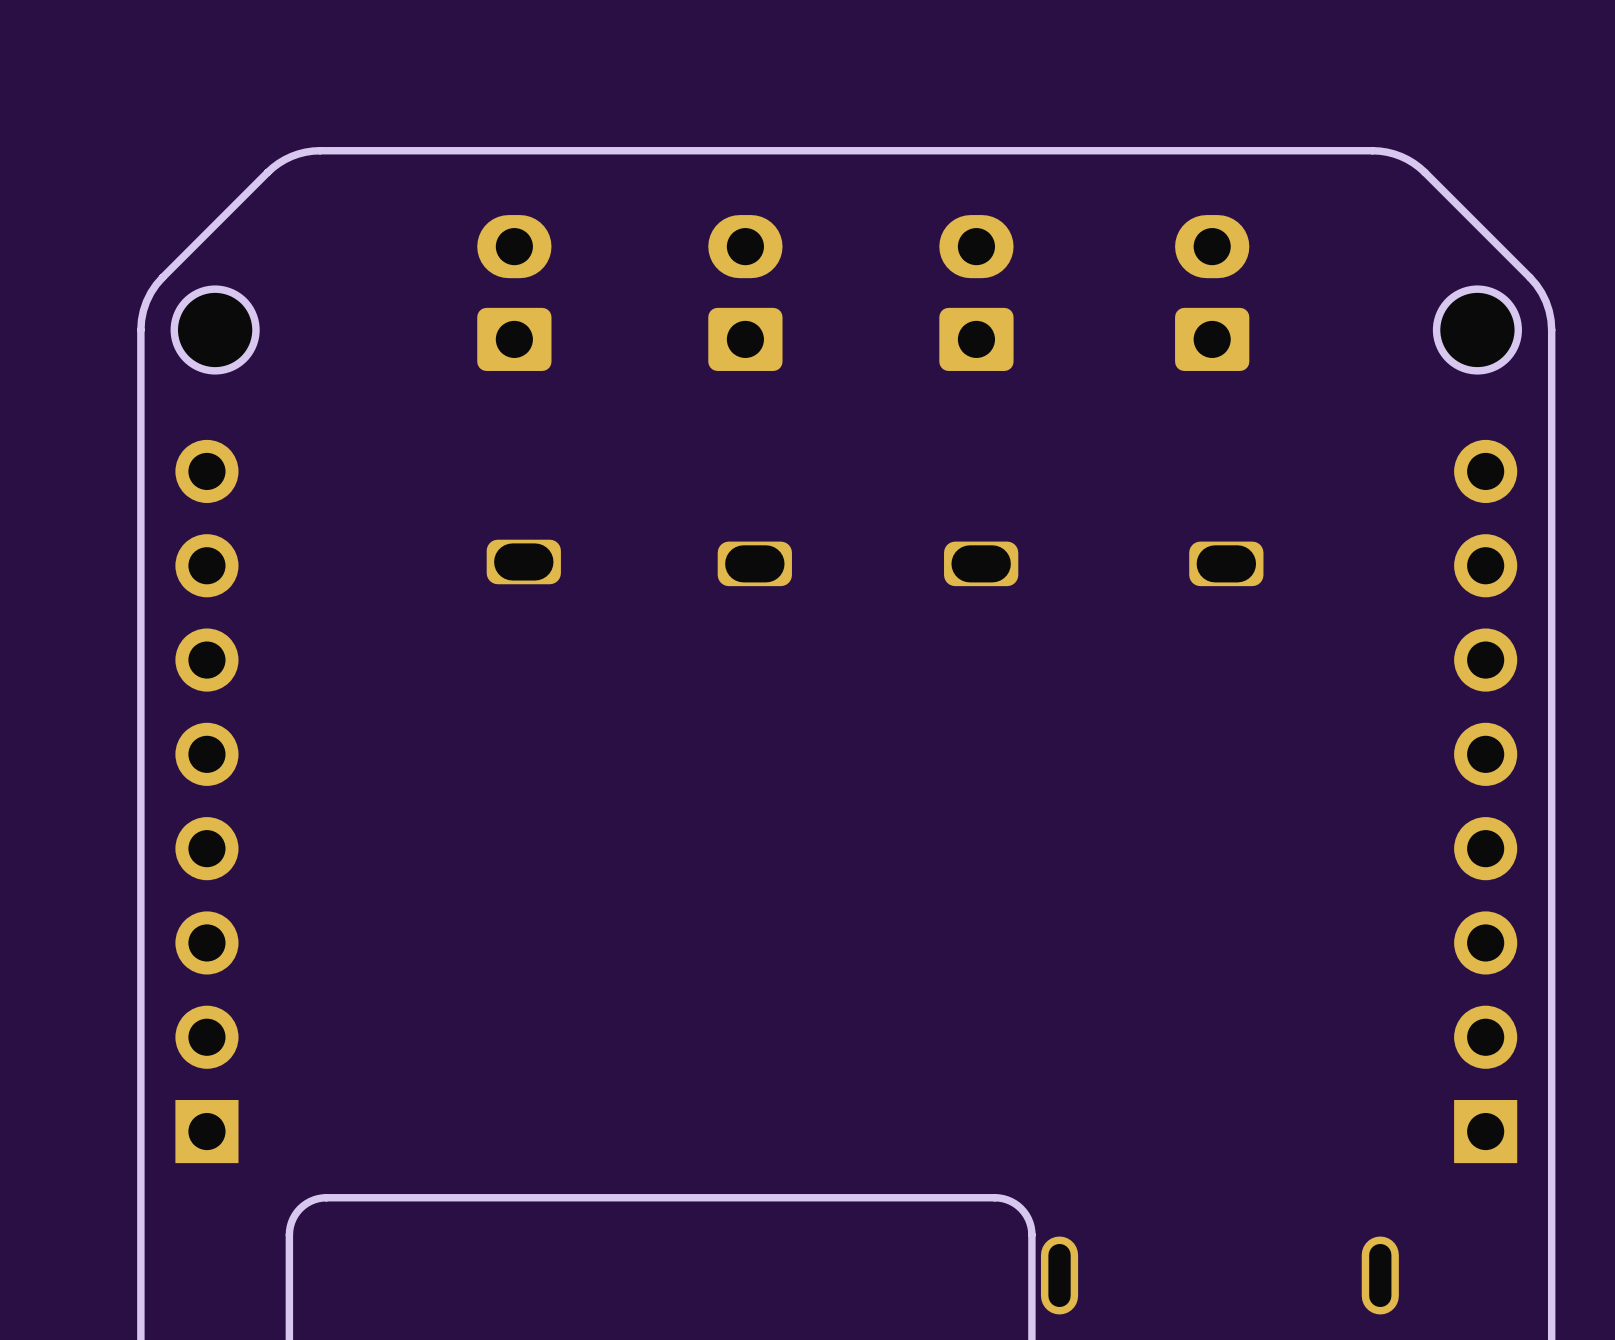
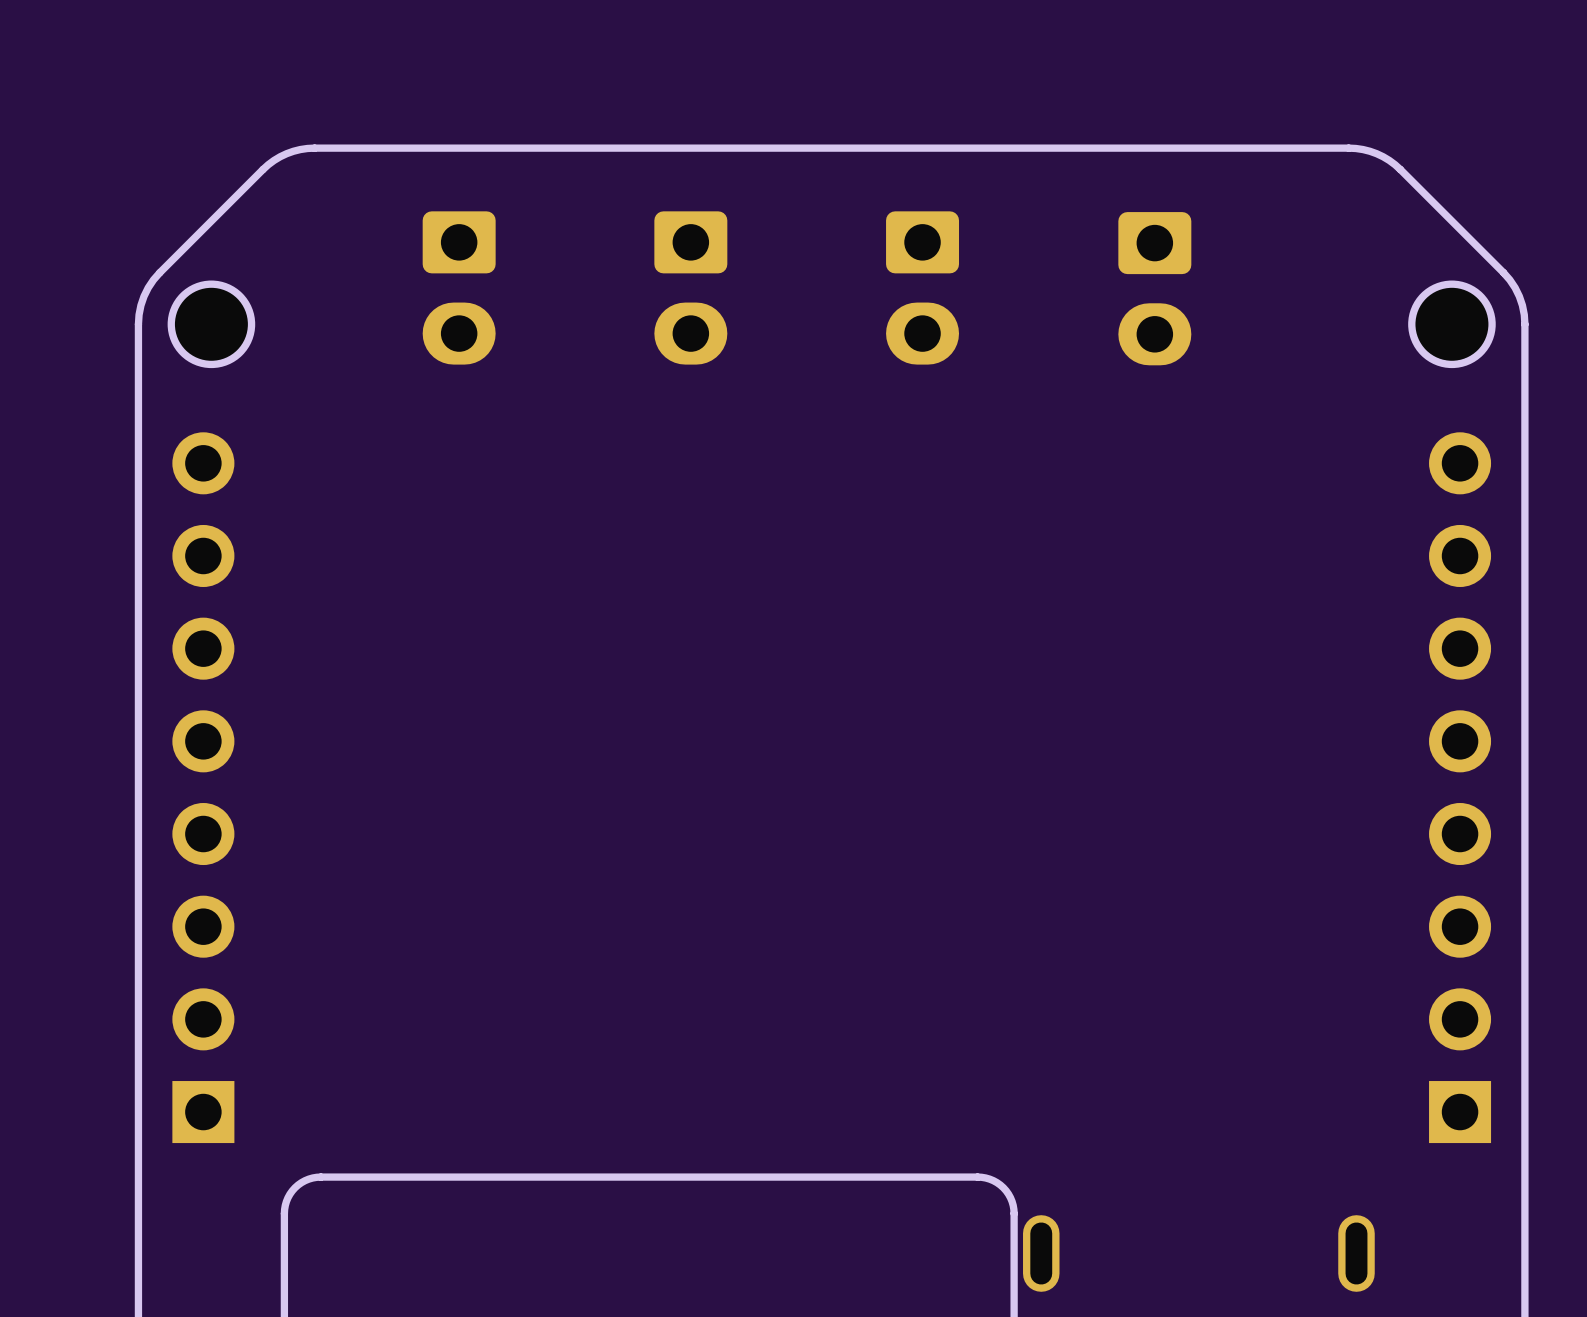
part rotation: 0° (514, 293) -> 180° (459, 287)
part rotation: 0° (745, 293) -> 180° (690, 287)
part rotation: 0° (976, 293) -> 180° (922, 287)
part rotation: 0° (1212, 293) -> 180° (1154, 288)
part: (523, 561) -> none
part: (754, 563) -> none
part: (981, 563) -> none
part: (1226, 563) -> none

